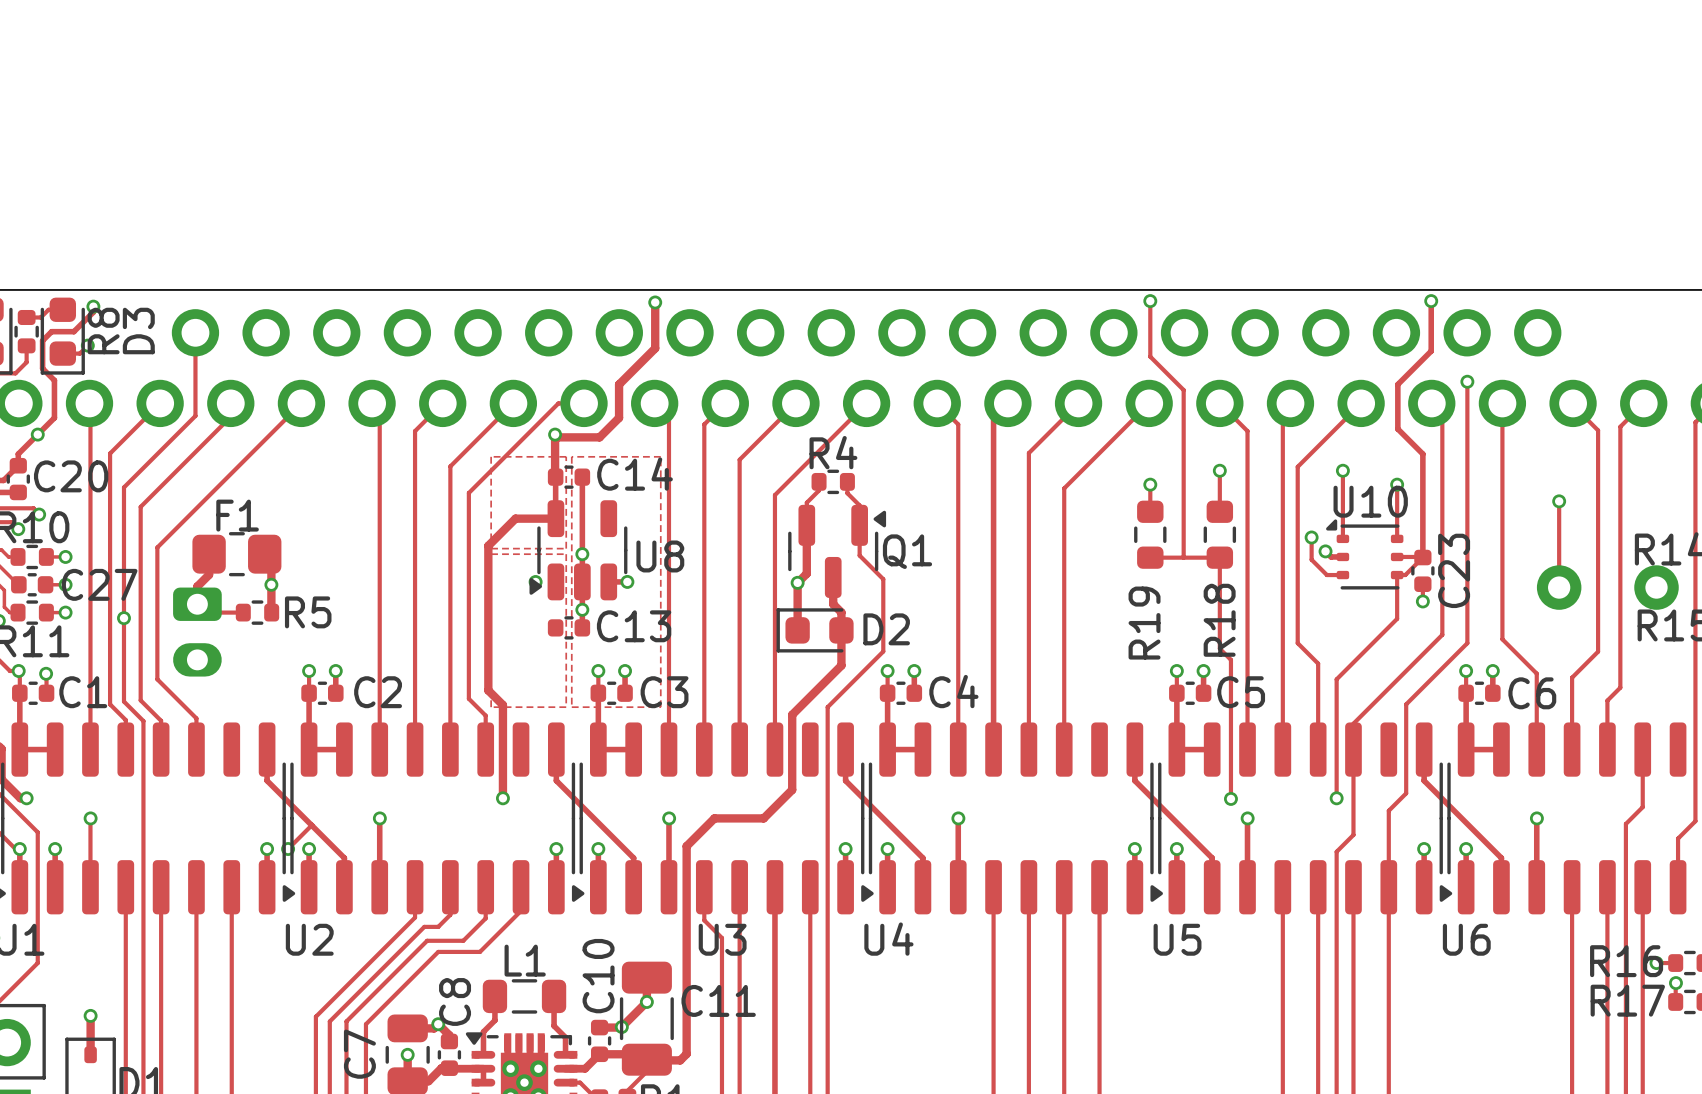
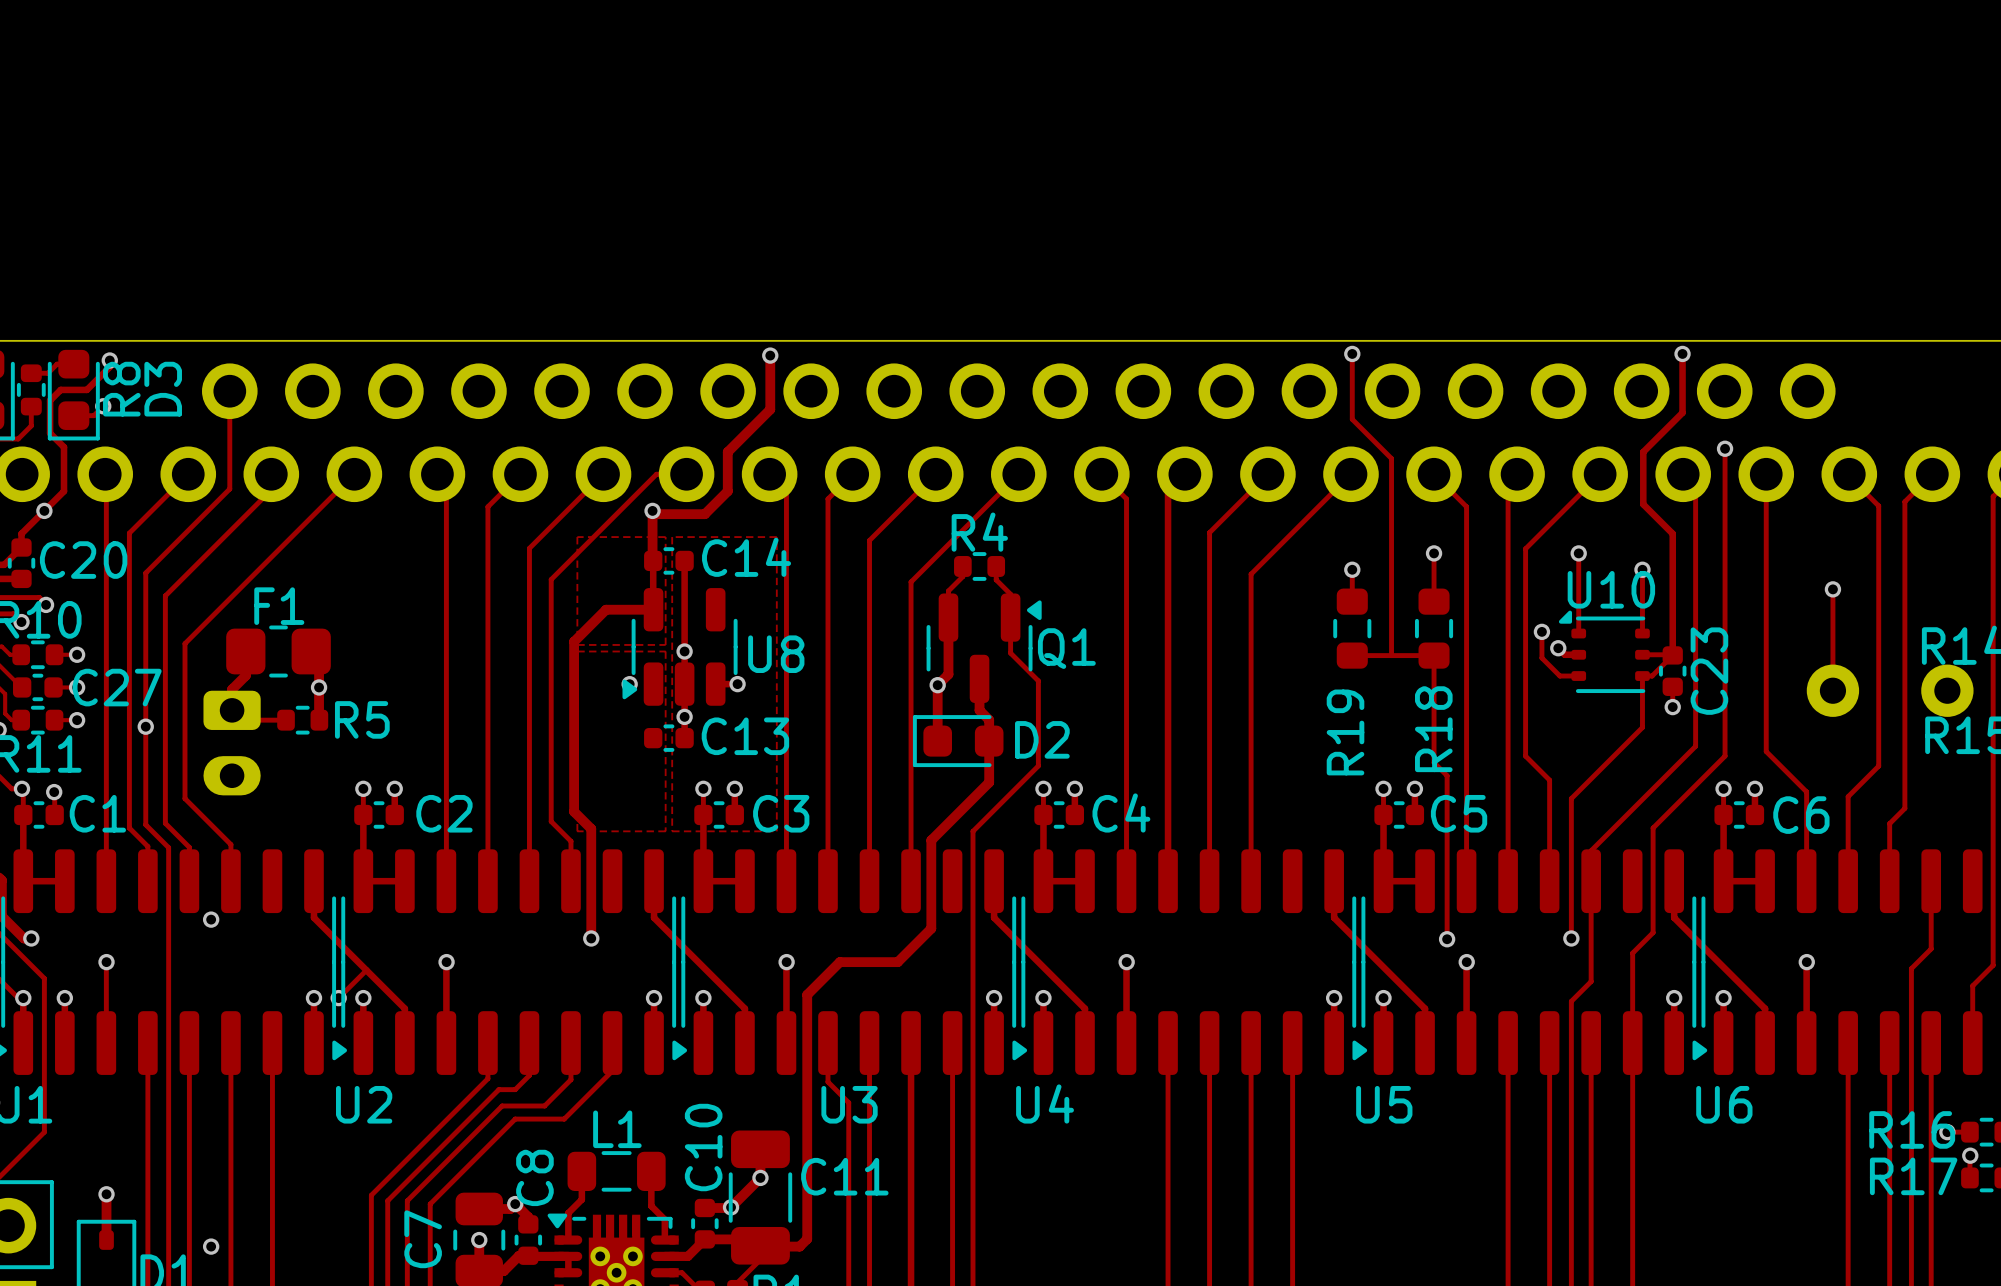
via: none -> (211, 919)
via: none -> (211, 1246)

